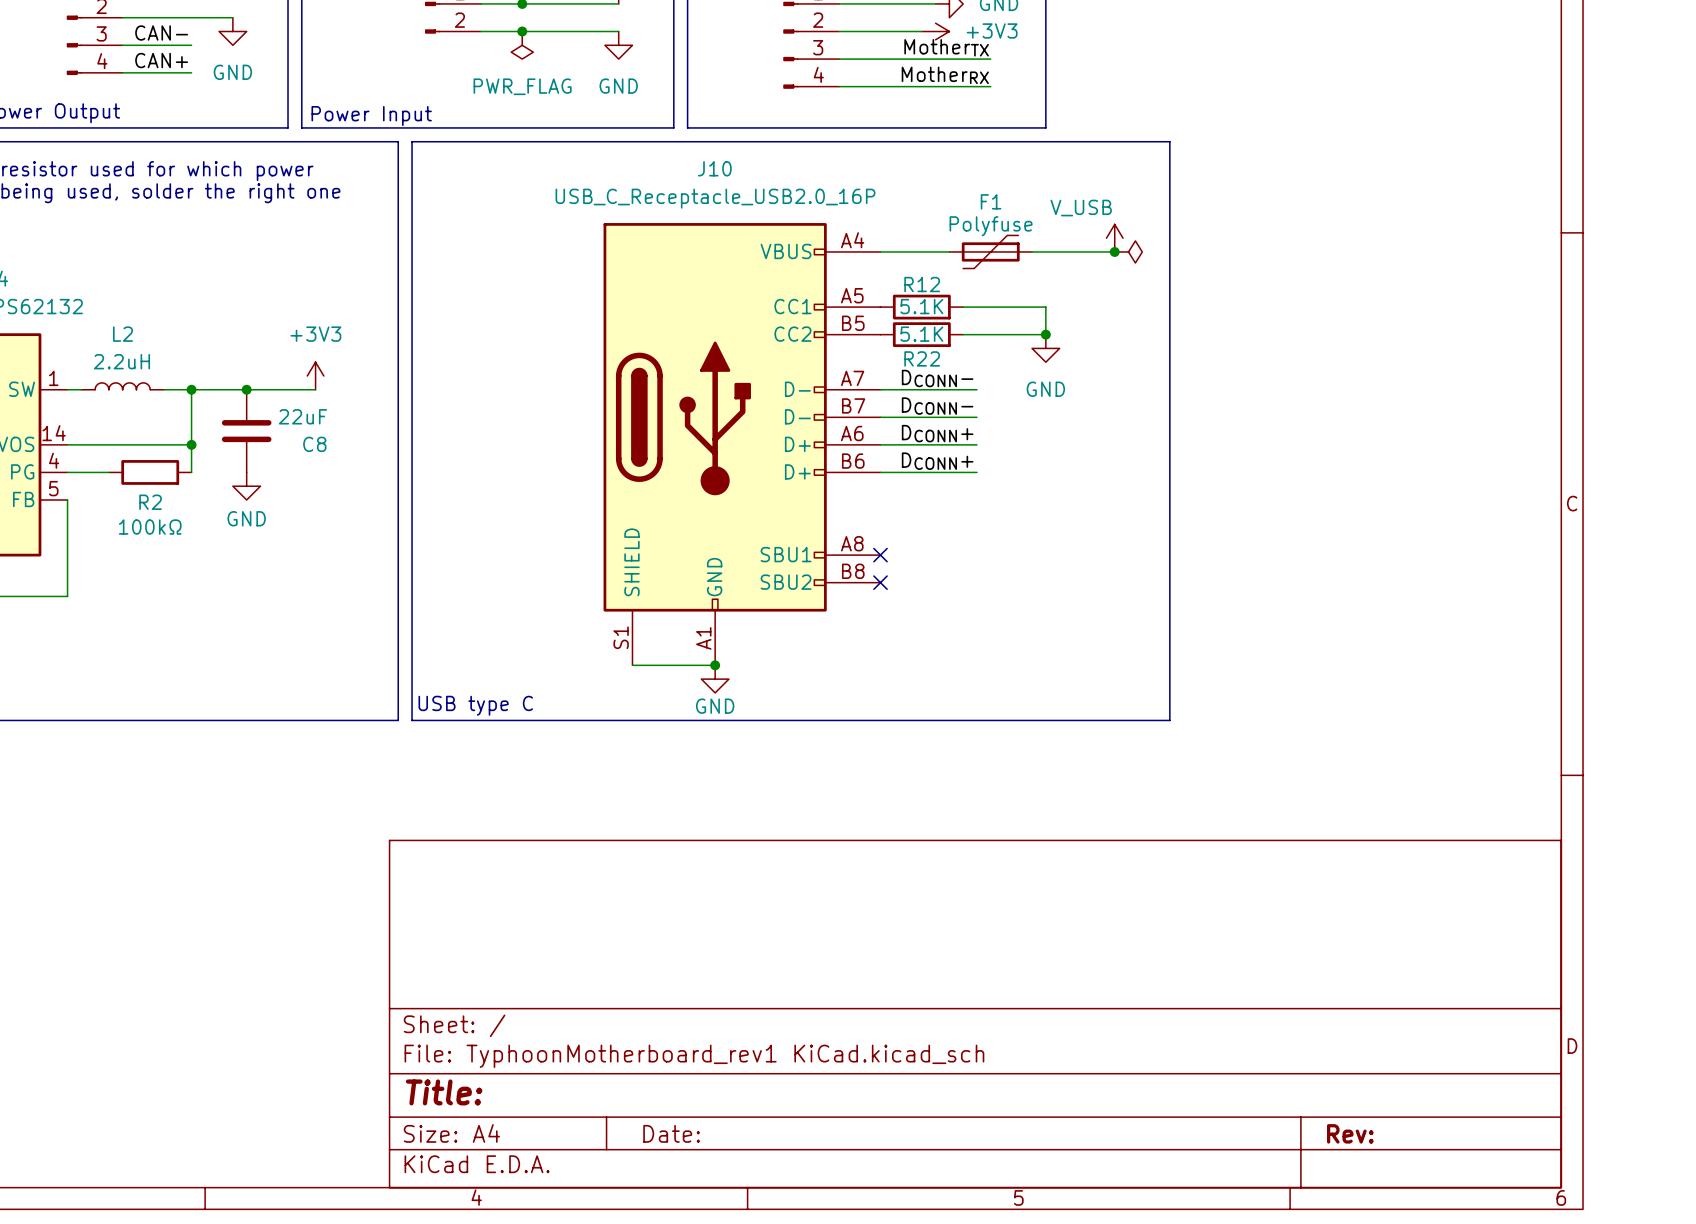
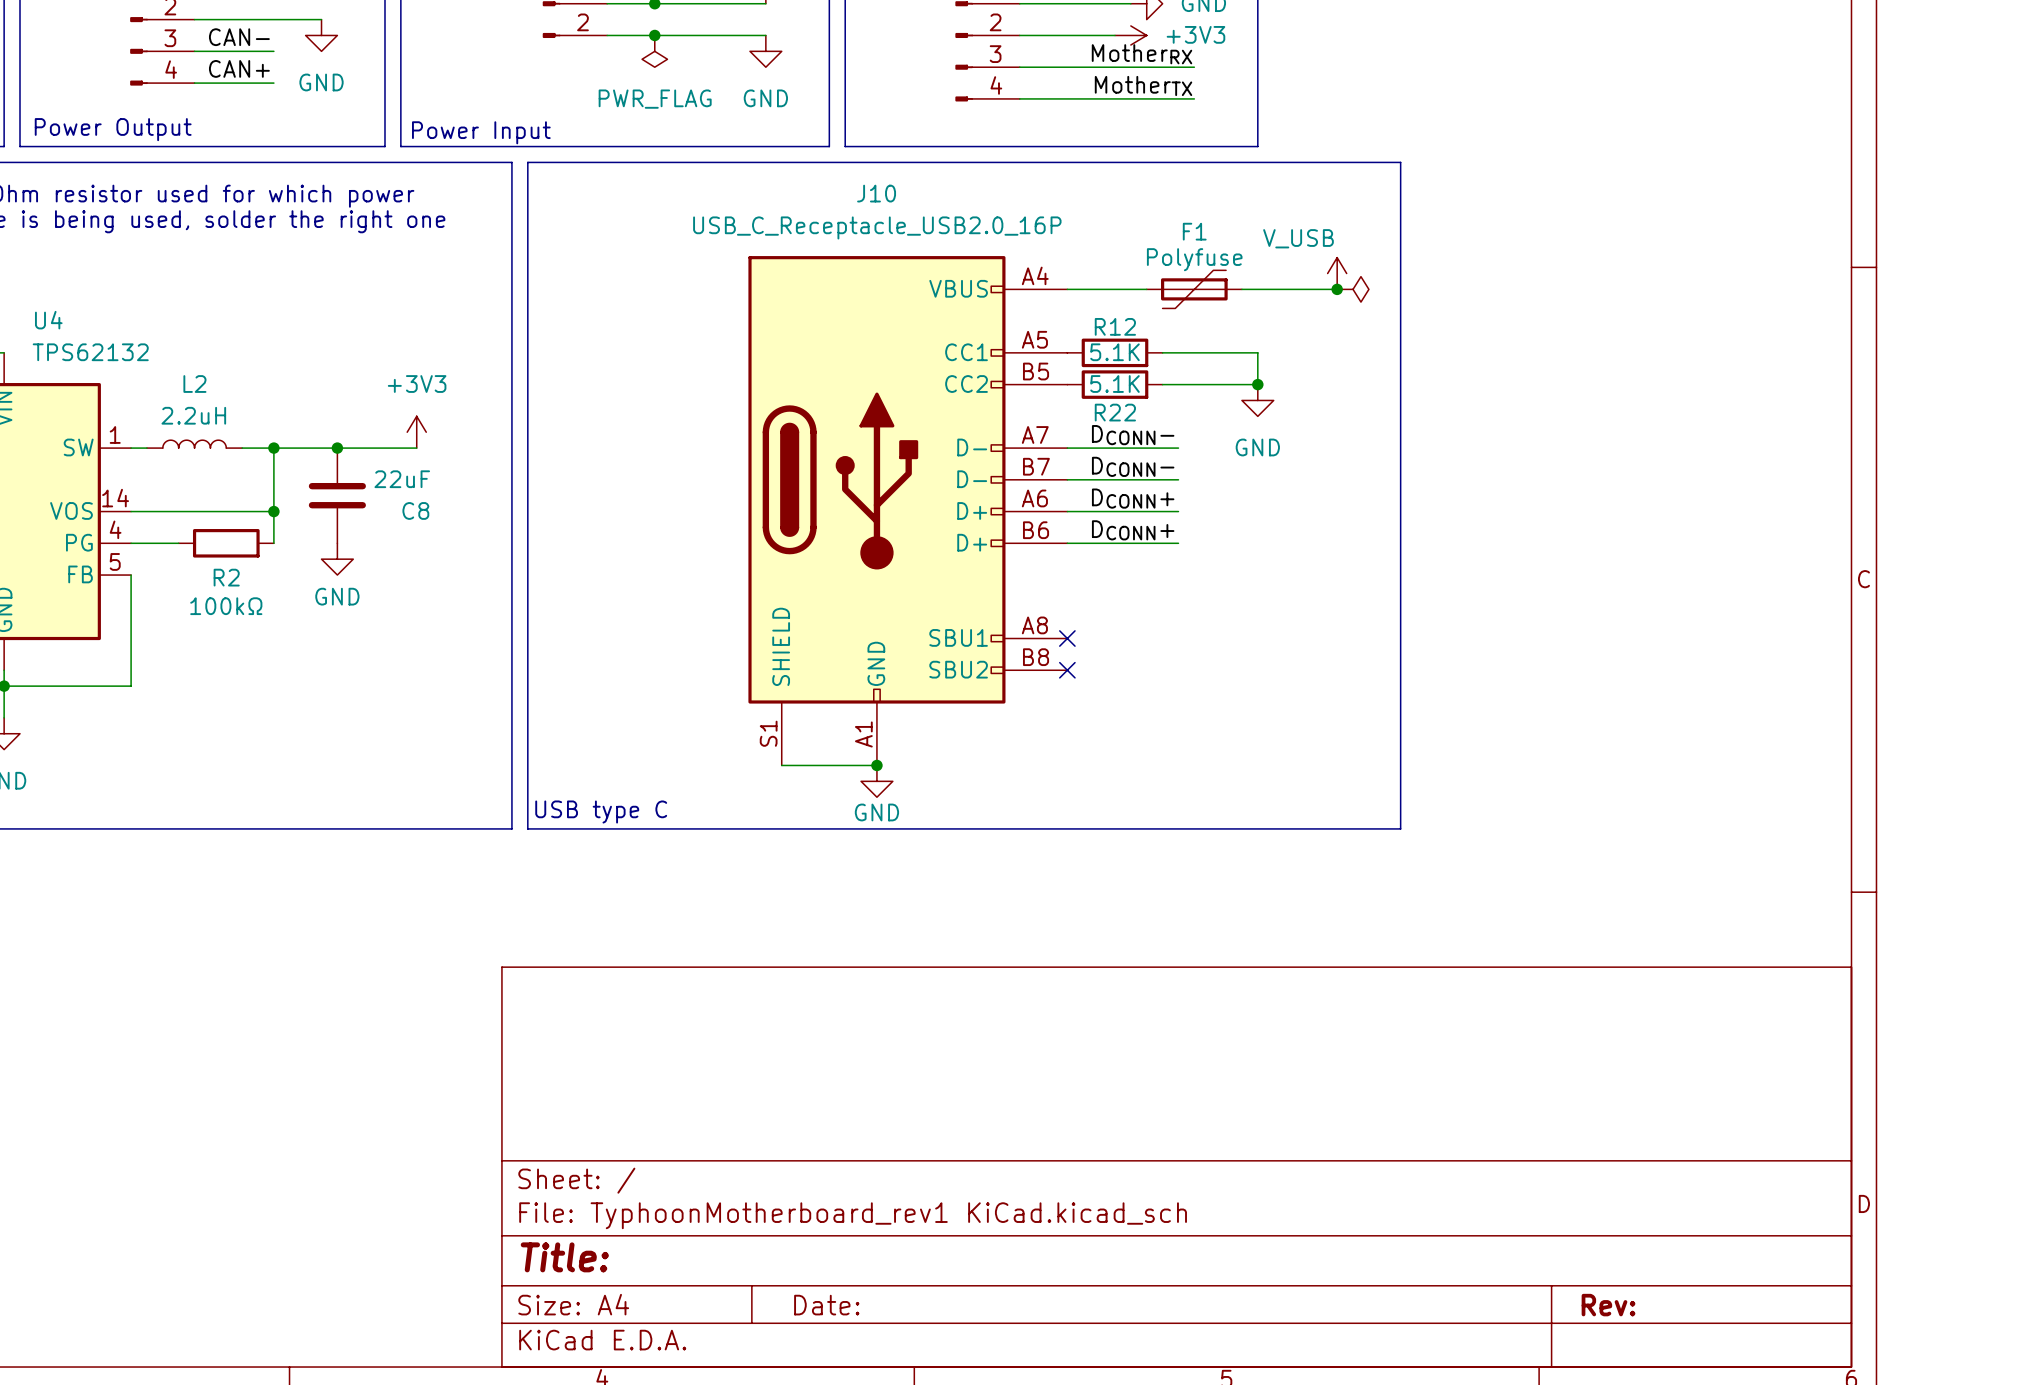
label: MotherTX (946, 47) -> MotherRX (1142, 54)
label: MotherRX (945, 75) -> MotherTX (1143, 85)

